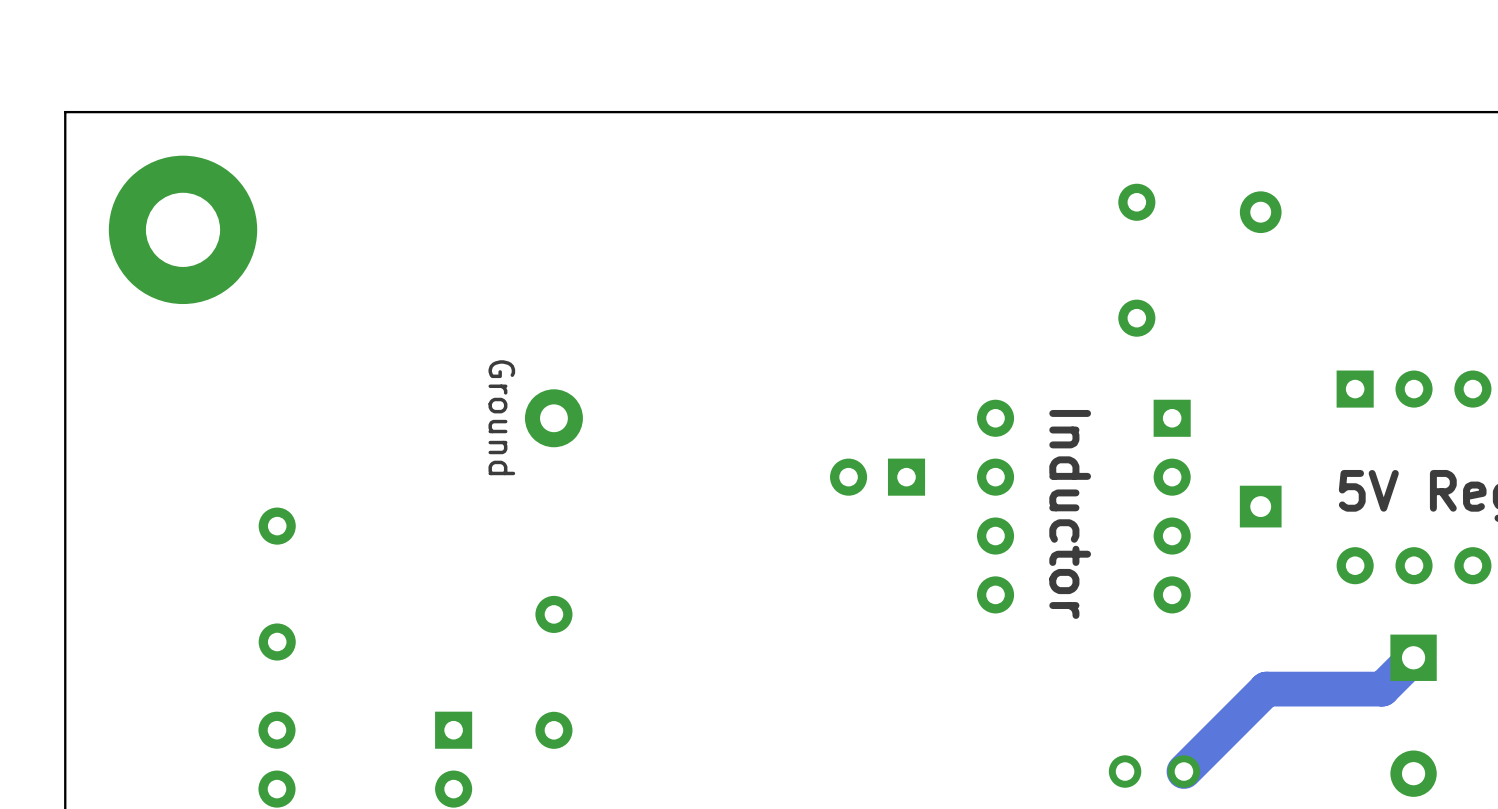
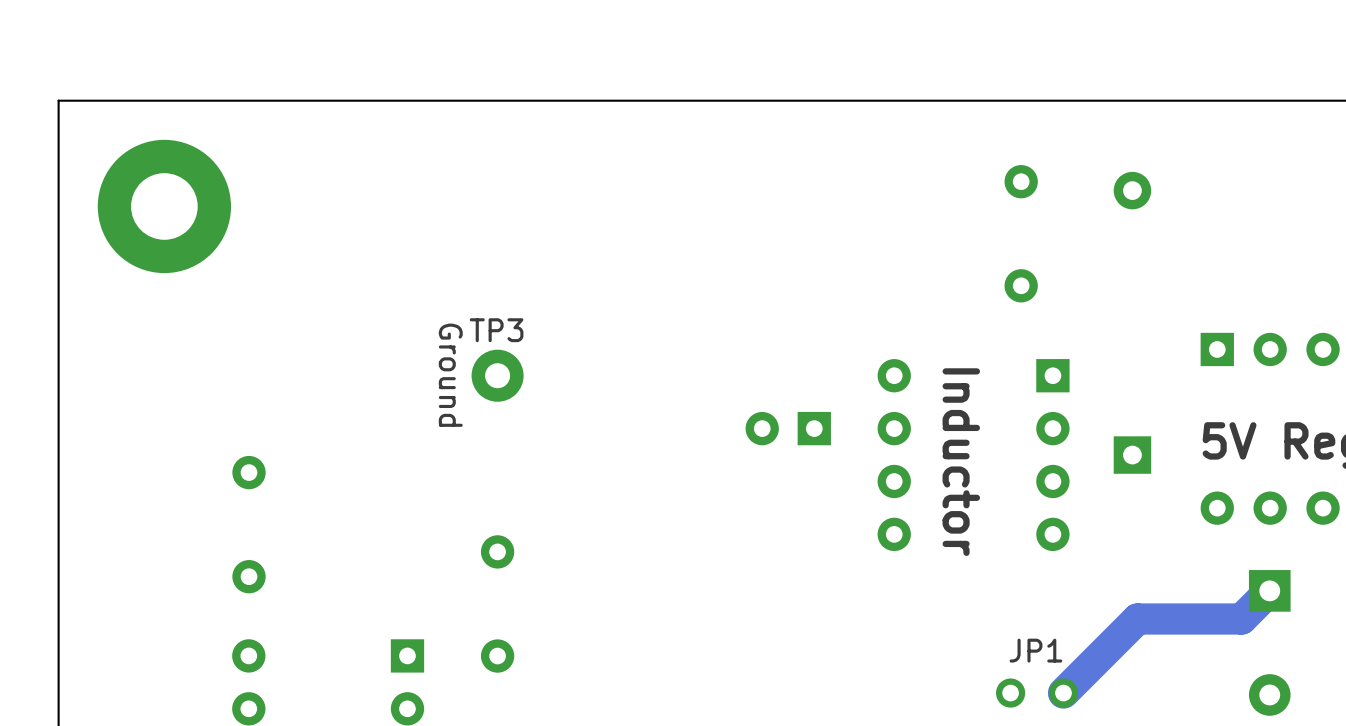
TP3 name: none -> TP3 (496, 330)
JP1 name: none -> JP1 (1035, 650)

